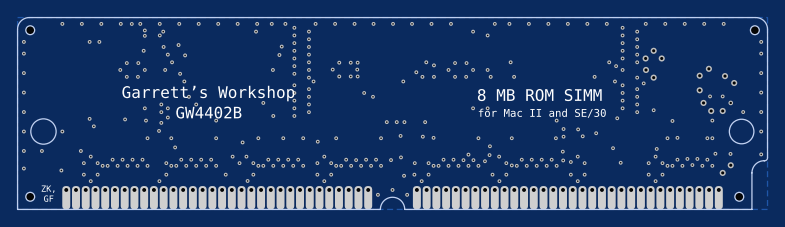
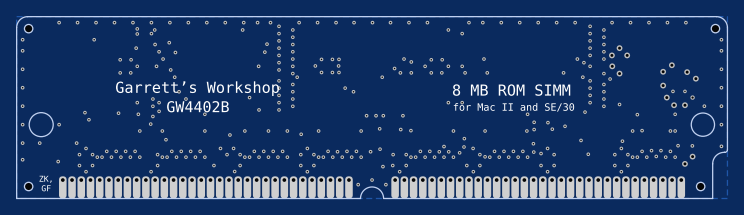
via: (131, 23) -> none
via: (89, 41) -> none
via: (120, 69) -> none

